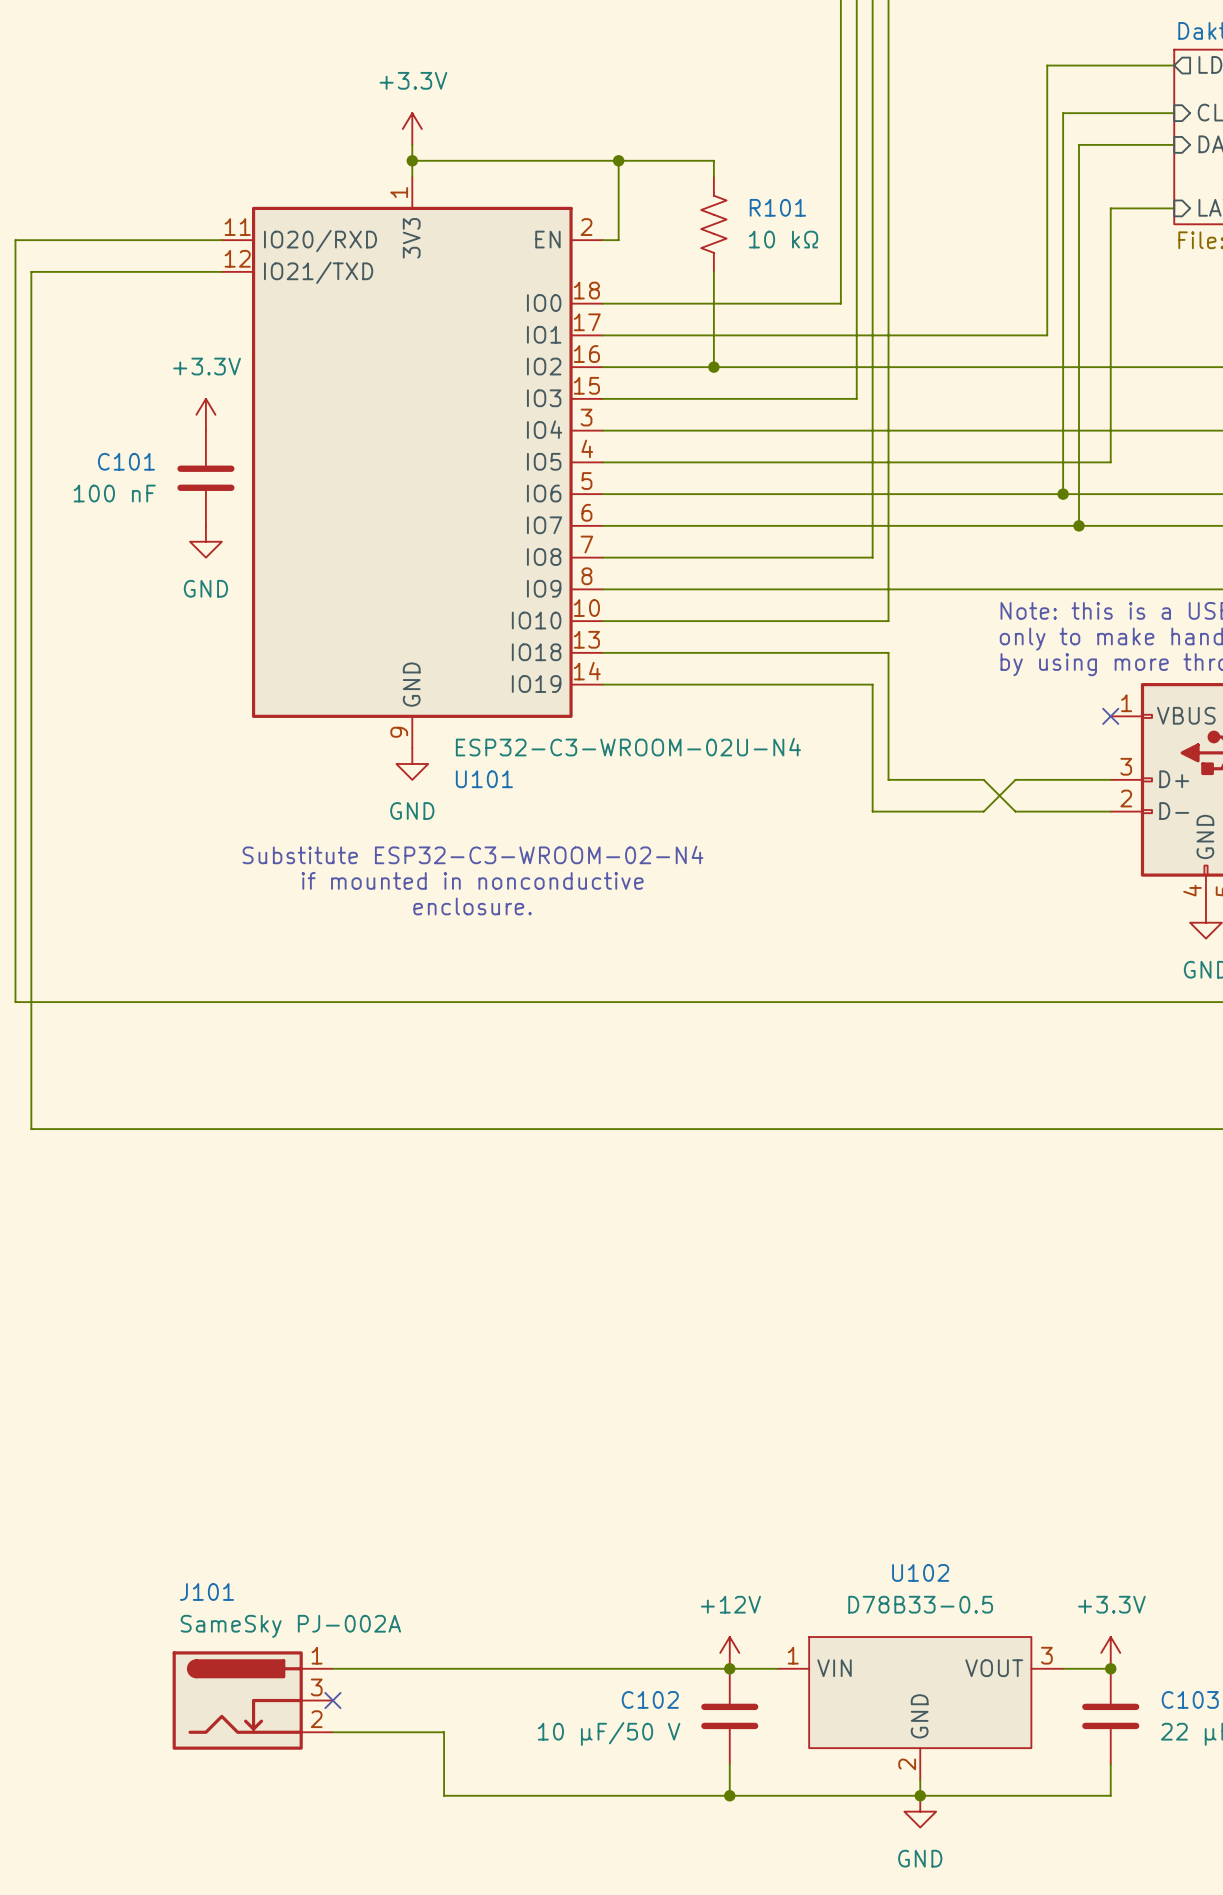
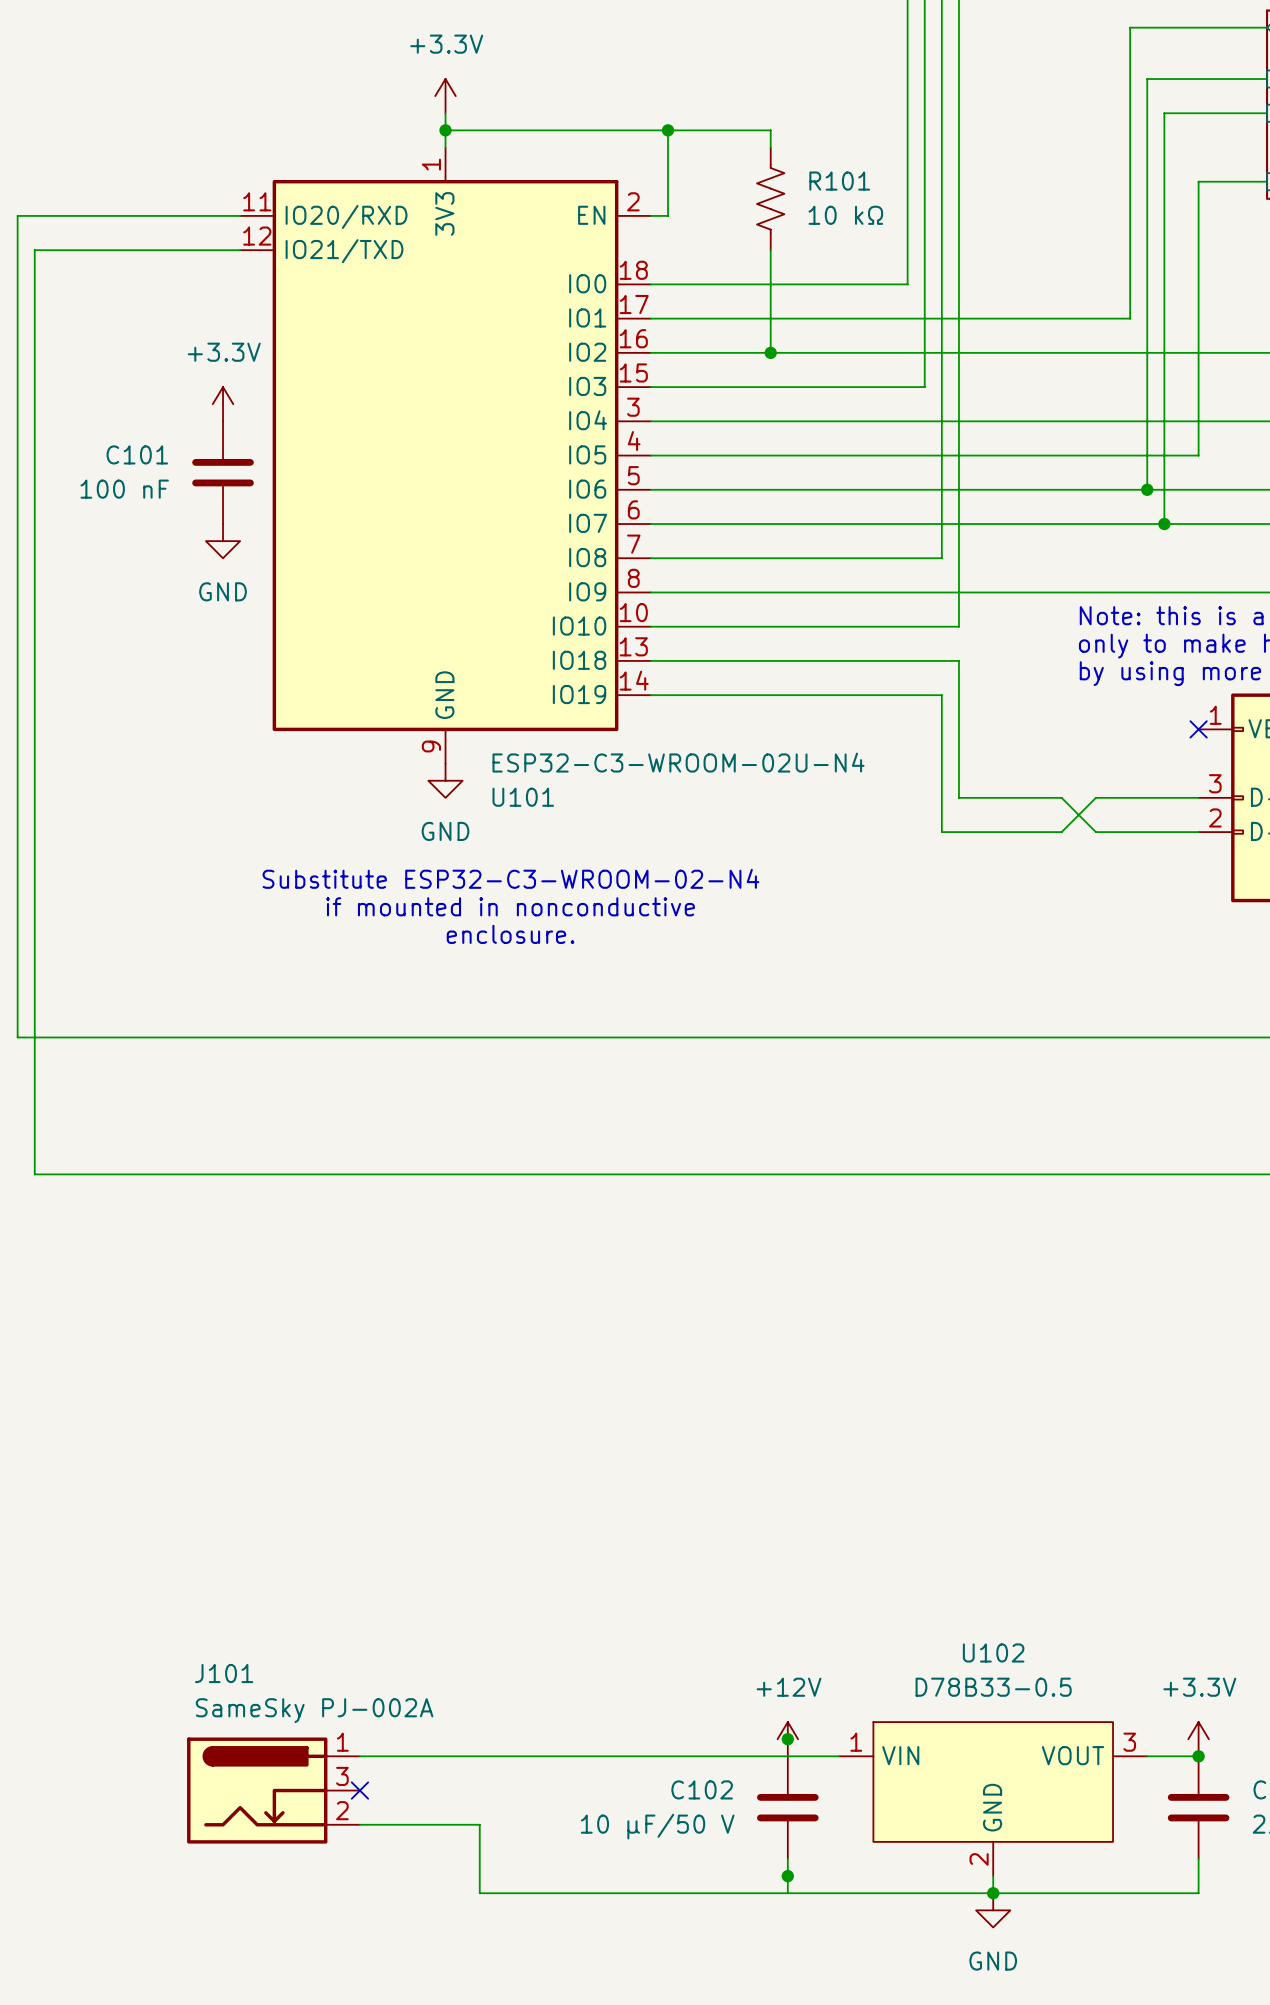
junction position: (729, 1668) -> (787, 1739)
junction position: (729, 1795) -> (787, 1876)

